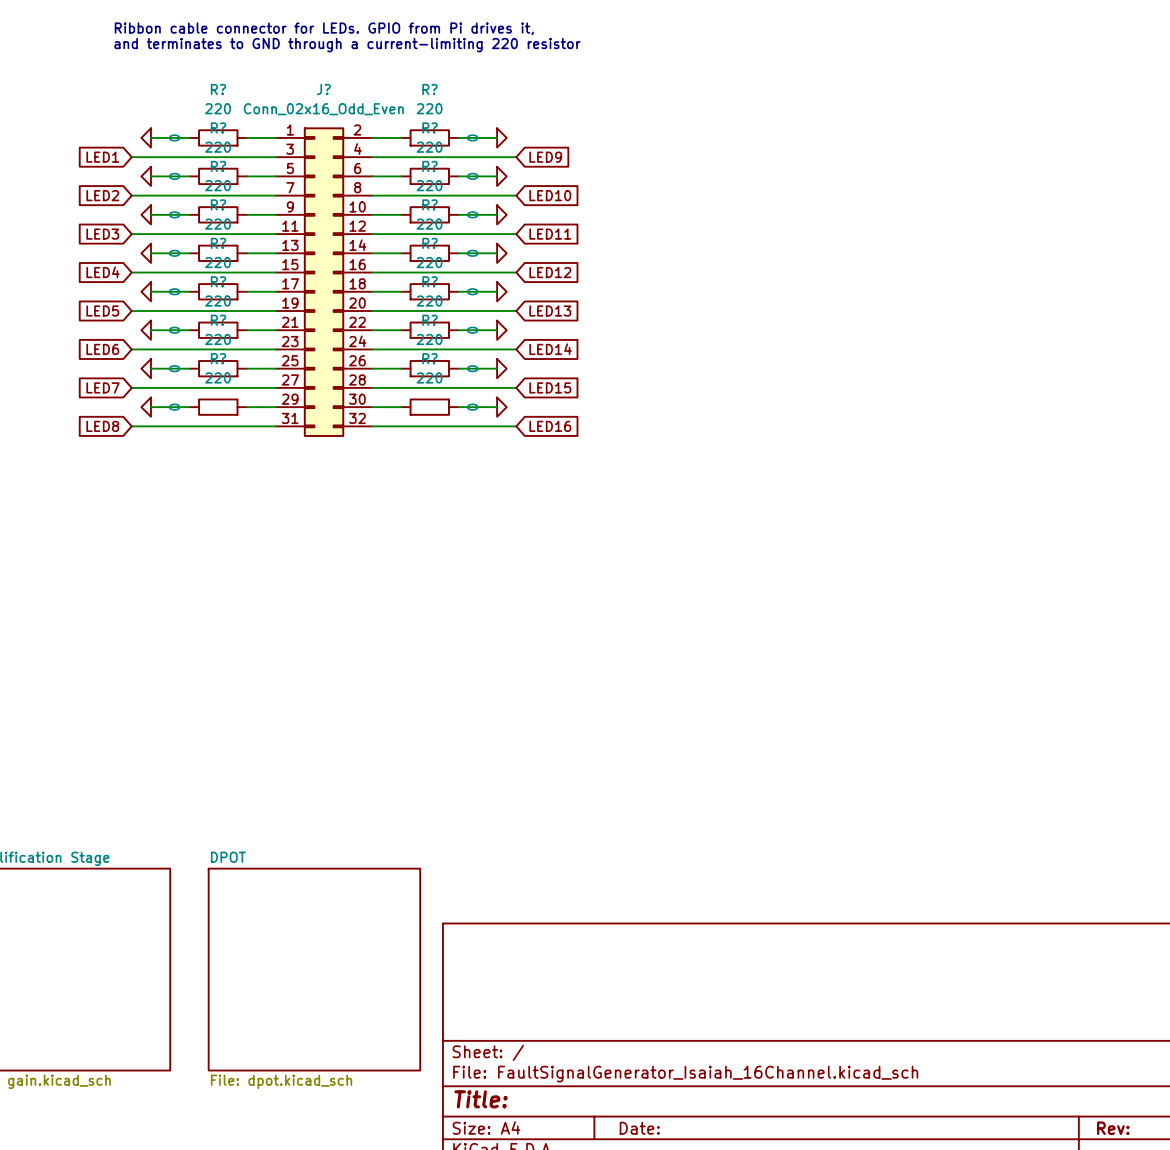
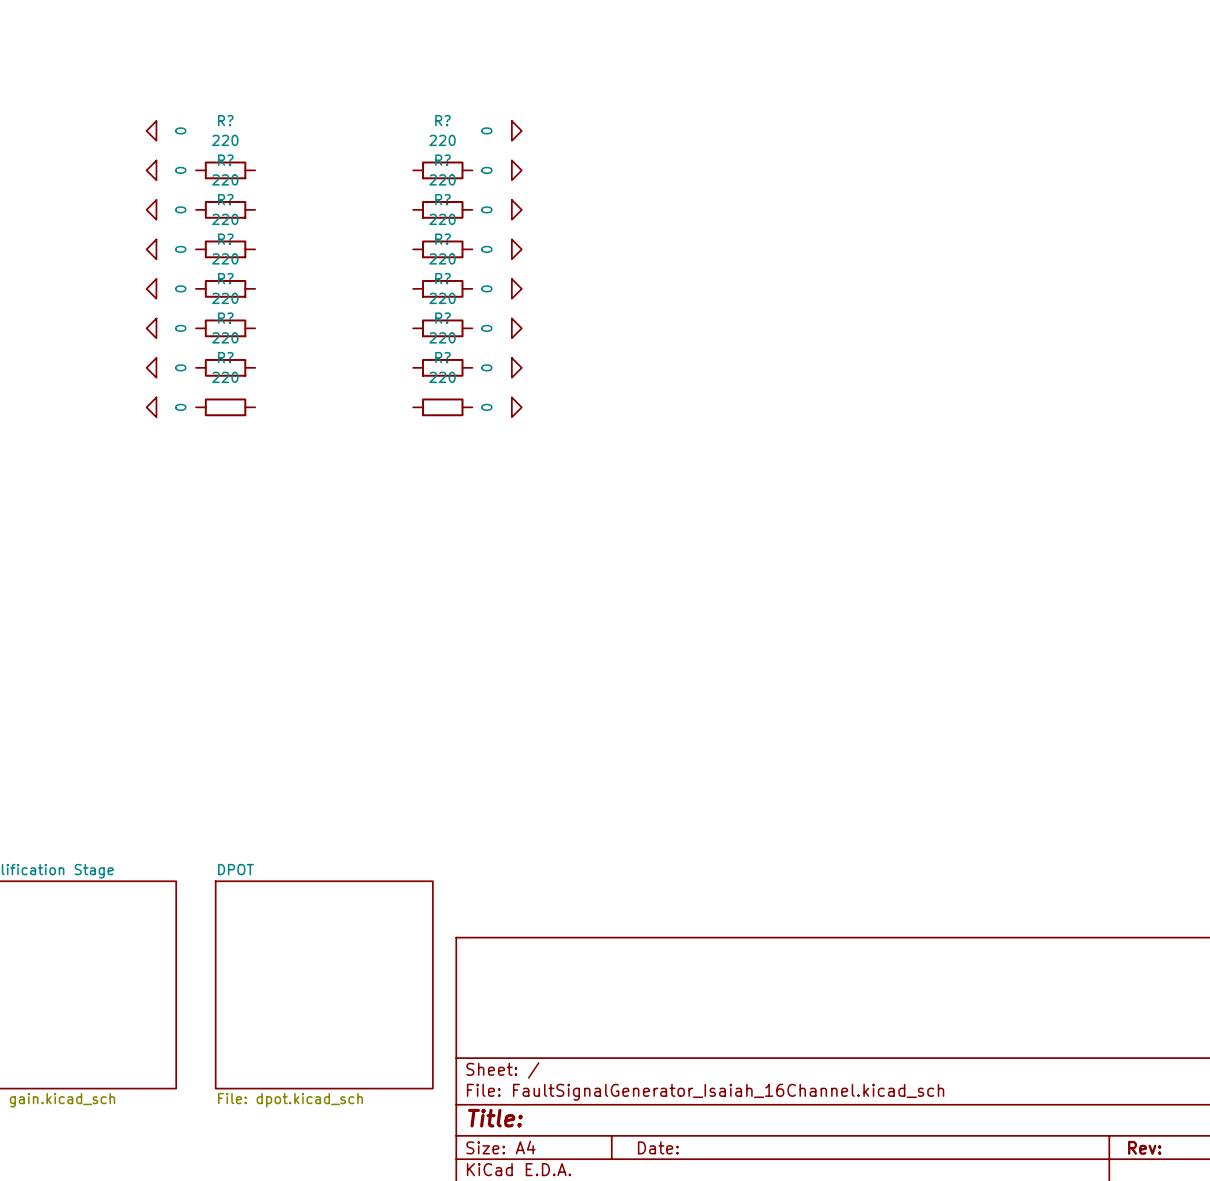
text: Ribbon cable connector for LEDs. GPIO from Pi drives it, (324, 28) -> none
text: and terminates to GND through a current-limiting 220 resistor (347, 45) -> none
wire: (150, 137) (189, 137) -> none
R?: 220 (218, 137) -> none
wire: (247, 137) (275, 137) -> none
wire: (372, 137) (400, 137) -> none
R?: 220 (429, 137) -> none
wire: (458, 137) (497, 137) -> none
global label: LED1 (102, 157) -> none
wire: (131, 157) (275, 157) -> none
wire: (372, 157) (516, 157) -> none
global label: LED9 (545, 157) -> none
wire: (150, 176) (189, 176) -> none
wire: (247, 176) (275, 176) -> none
wire: (372, 176) (400, 176) -> none
wire: (458, 176) (497, 176) -> none
global label: LED2 (102, 195) -> none
wire: (131, 195) (275, 195) -> none
wire: (372, 195) (516, 195) -> none
global label: LED10 (550, 195) -> none
wire: (150, 214) (189, 214) -> none
wire: (247, 214) (275, 214) -> none
wire: (372, 214) (400, 214) -> none
wire: (458, 214) (497, 214) -> none
global label: LED3 (102, 234) -> none
wire: (131, 234) (275, 234) -> none
wire: (372, 234) (516, 234) -> none
global label: LED11 (550, 234) -> none
wire: (150, 253) (189, 253) -> none
wire: (247, 253) (275, 253) -> none
wire: (372, 253) (400, 253) -> none
wire: (458, 253) (497, 253) -> none
global label: LED4 (103, 272) -> none
wire: (131, 272) (275, 272) -> none
wire: (372, 272) (516, 272) -> none
global label: LED12 (550, 272) -> none
J?: Conn_02x16_Odd_Even (324, 282) -> none
wire: (150, 291) (189, 291) -> none
wire: (247, 291) (275, 291) -> none
wire: (372, 291) (400, 291) -> none
wire: (458, 291) (497, 291) -> none
global label: LED5 (102, 311) -> none
wire: (131, 311) (275, 311) -> none
wire: (372, 311) (516, 311) -> none
global label: LED13 (550, 311) -> none
wire: (150, 330) (189, 330) -> none
wire: (247, 330) (275, 330) -> none
wire: (372, 330) (400, 330) -> none
wire: (458, 330) (497, 330) -> none
global label: LED6 (102, 349) -> none
wire: (131, 349) (275, 349) -> none
wire: (372, 349) (516, 349) -> none
global label: LED14 (550, 349) -> none
wire: (150, 368) (189, 368) -> none
wire: (247, 368) (275, 368) -> none
wire: (372, 368) (400, 368) -> none
wire: (458, 368) (497, 368) -> none
global label: LED7 (103, 387) -> none
wire: (131, 387) (275, 387) -> none
wire: (372, 387) (516, 387) -> none
global label: LED15 (550, 387) -> none
wire: (150, 407) (189, 407) -> none
wire: (247, 407) (275, 407) -> none
wire: (372, 407) (400, 407) -> none
wire: (458, 407) (497, 407) -> none
global label: LED8 (102, 426) -> none
wire: (131, 426) (275, 426) -> none
wire: (372, 426) (516, 426) -> none
global label: LED16 (550, 426) -> none

